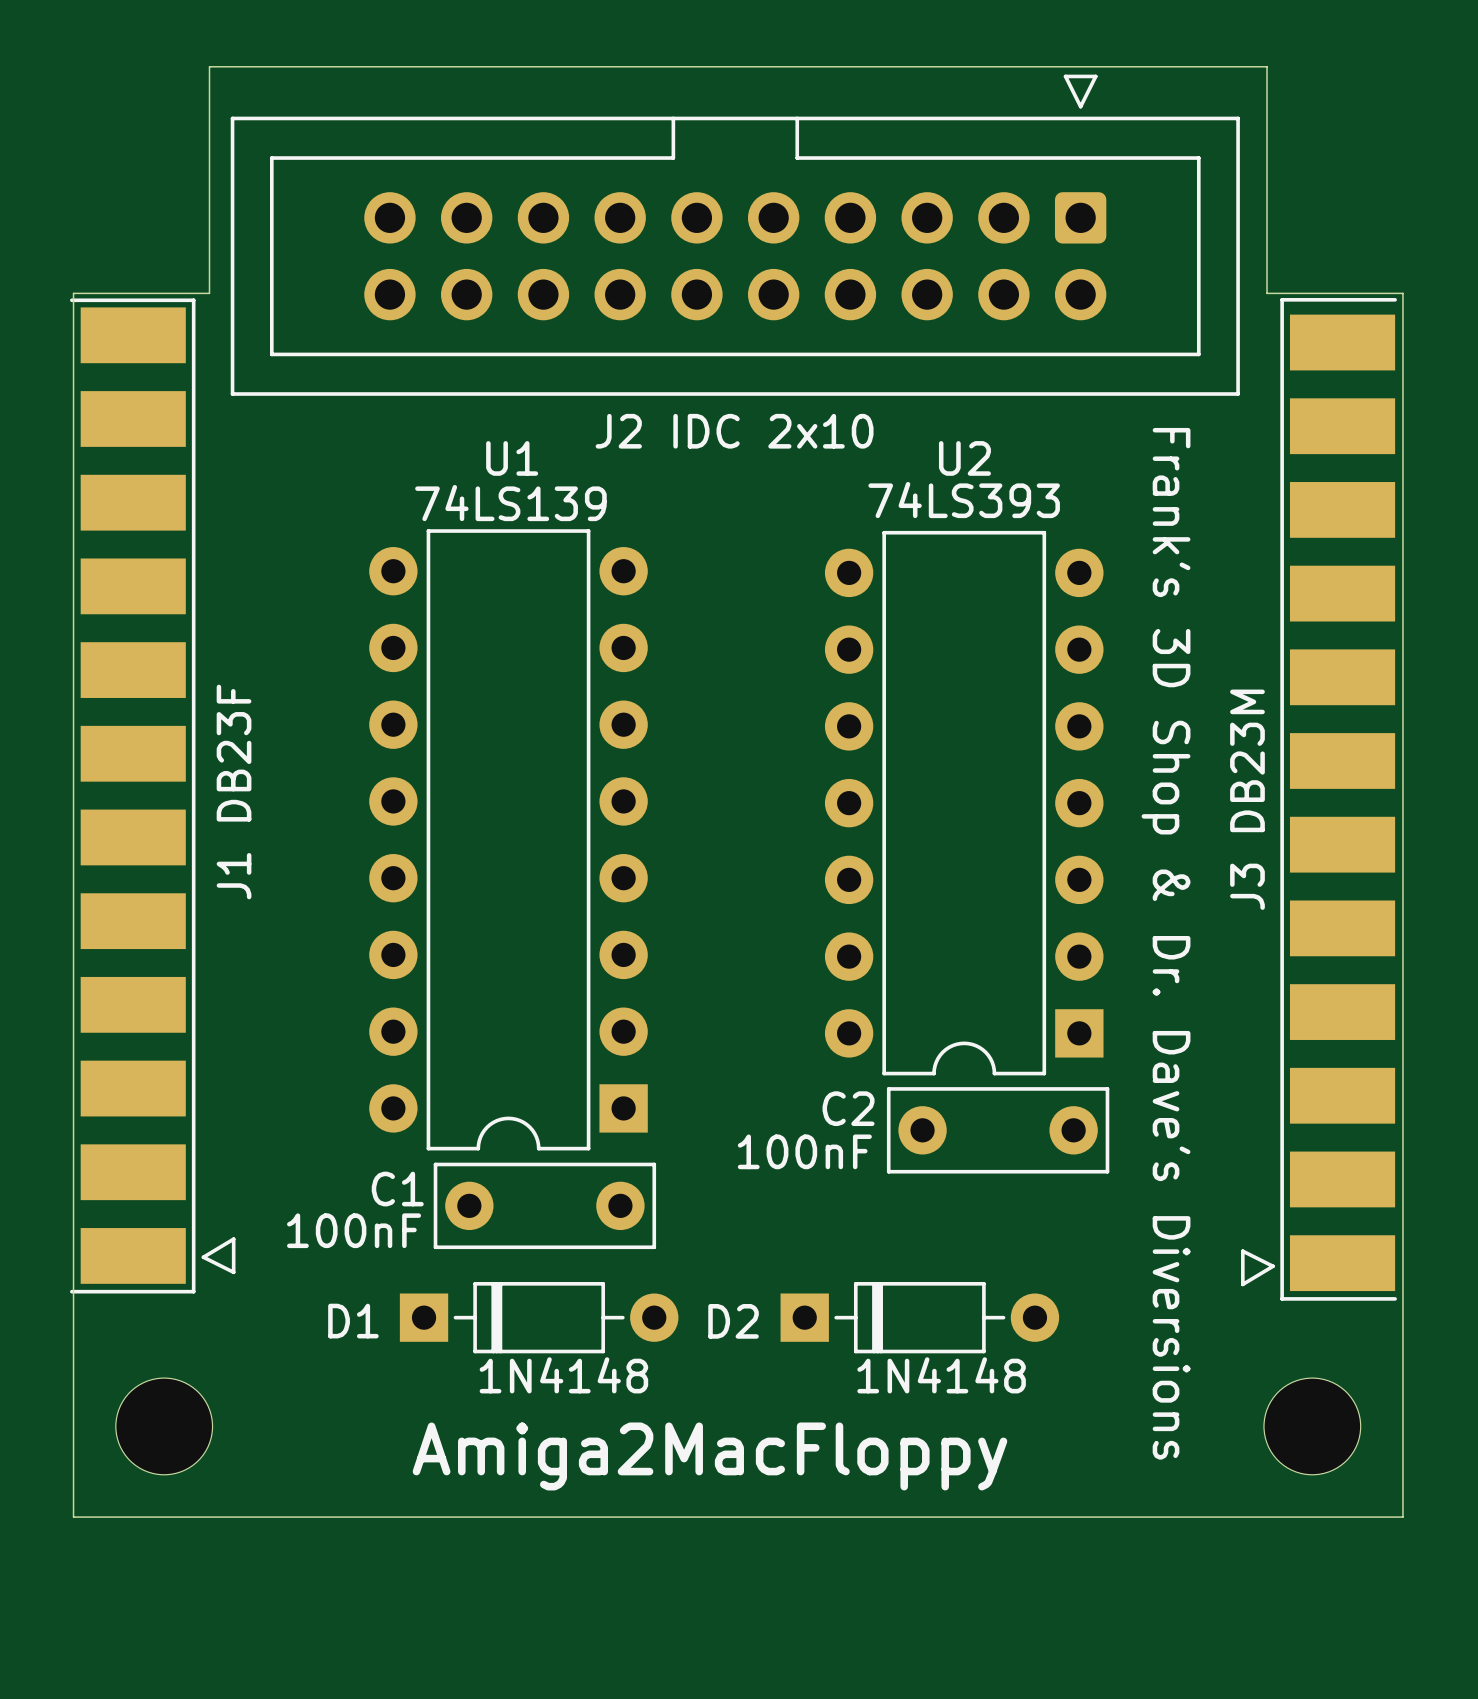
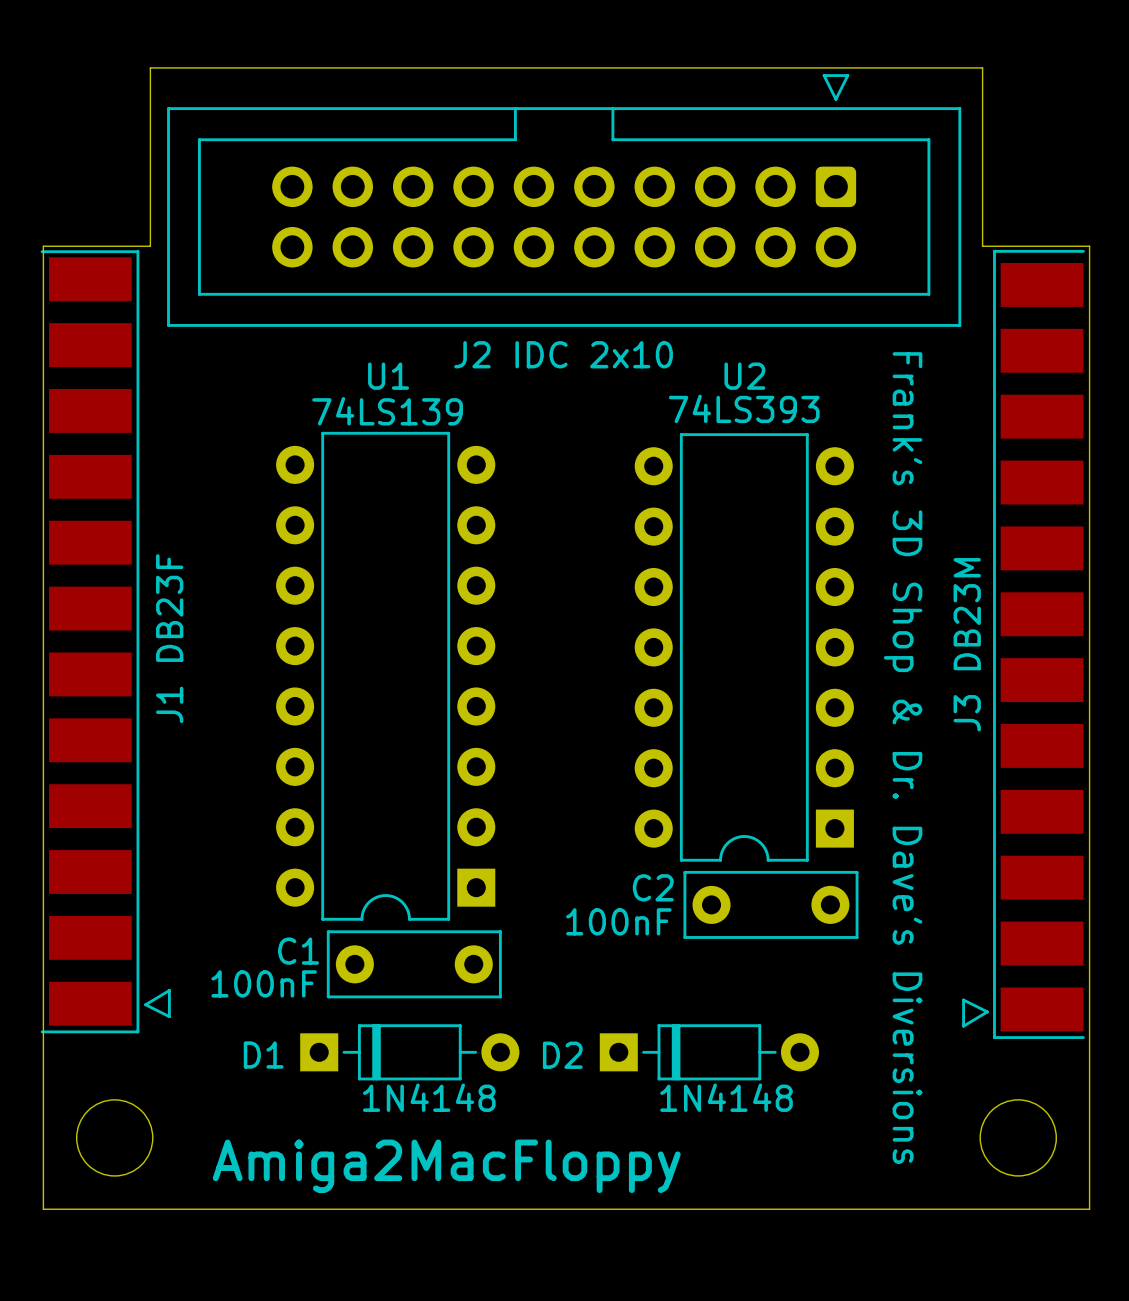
text position: Amiga2MacFloppy (709, 1456) -> Amiga2MacFloppy (446, 1166)

